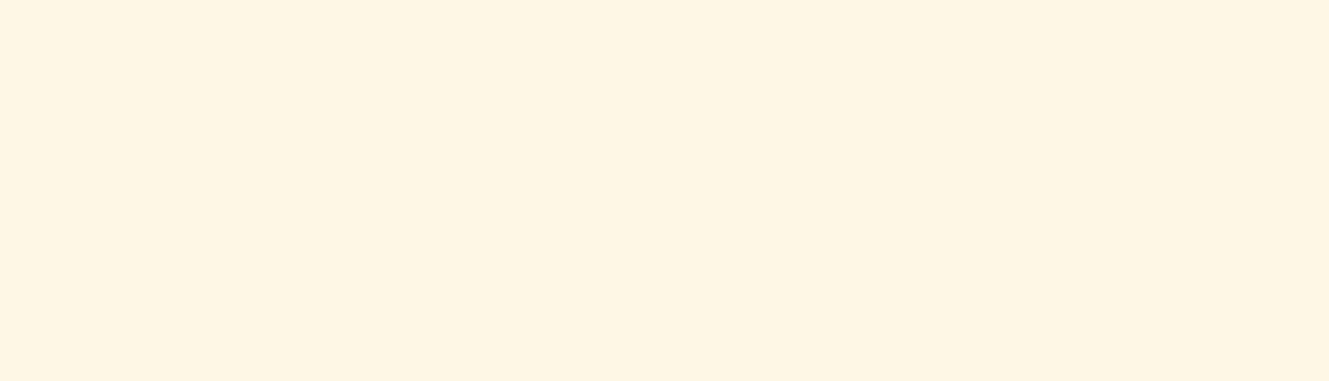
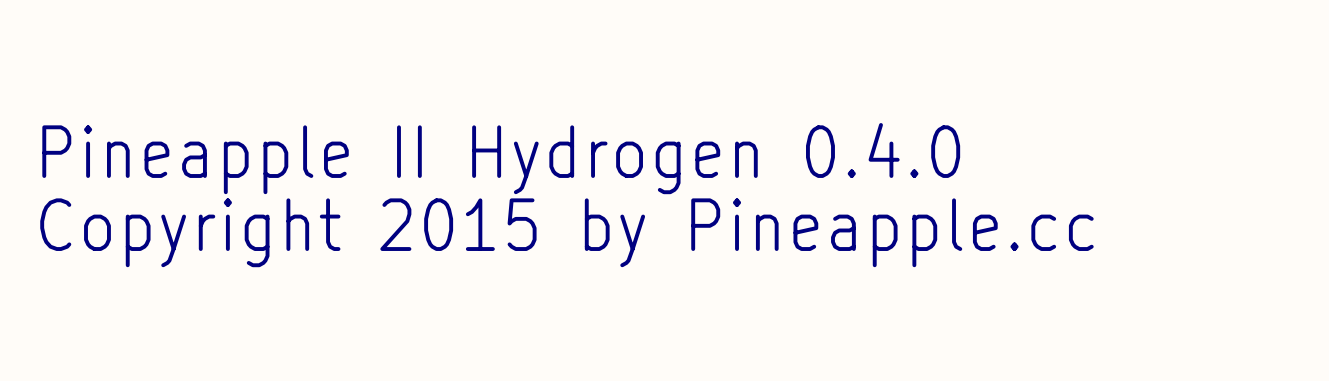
text: none -> Pineapple II Hydrogen 0.4.0 (501, 158)
text: none -> Copyright 2015 by Pineapple.cc (566, 232)

